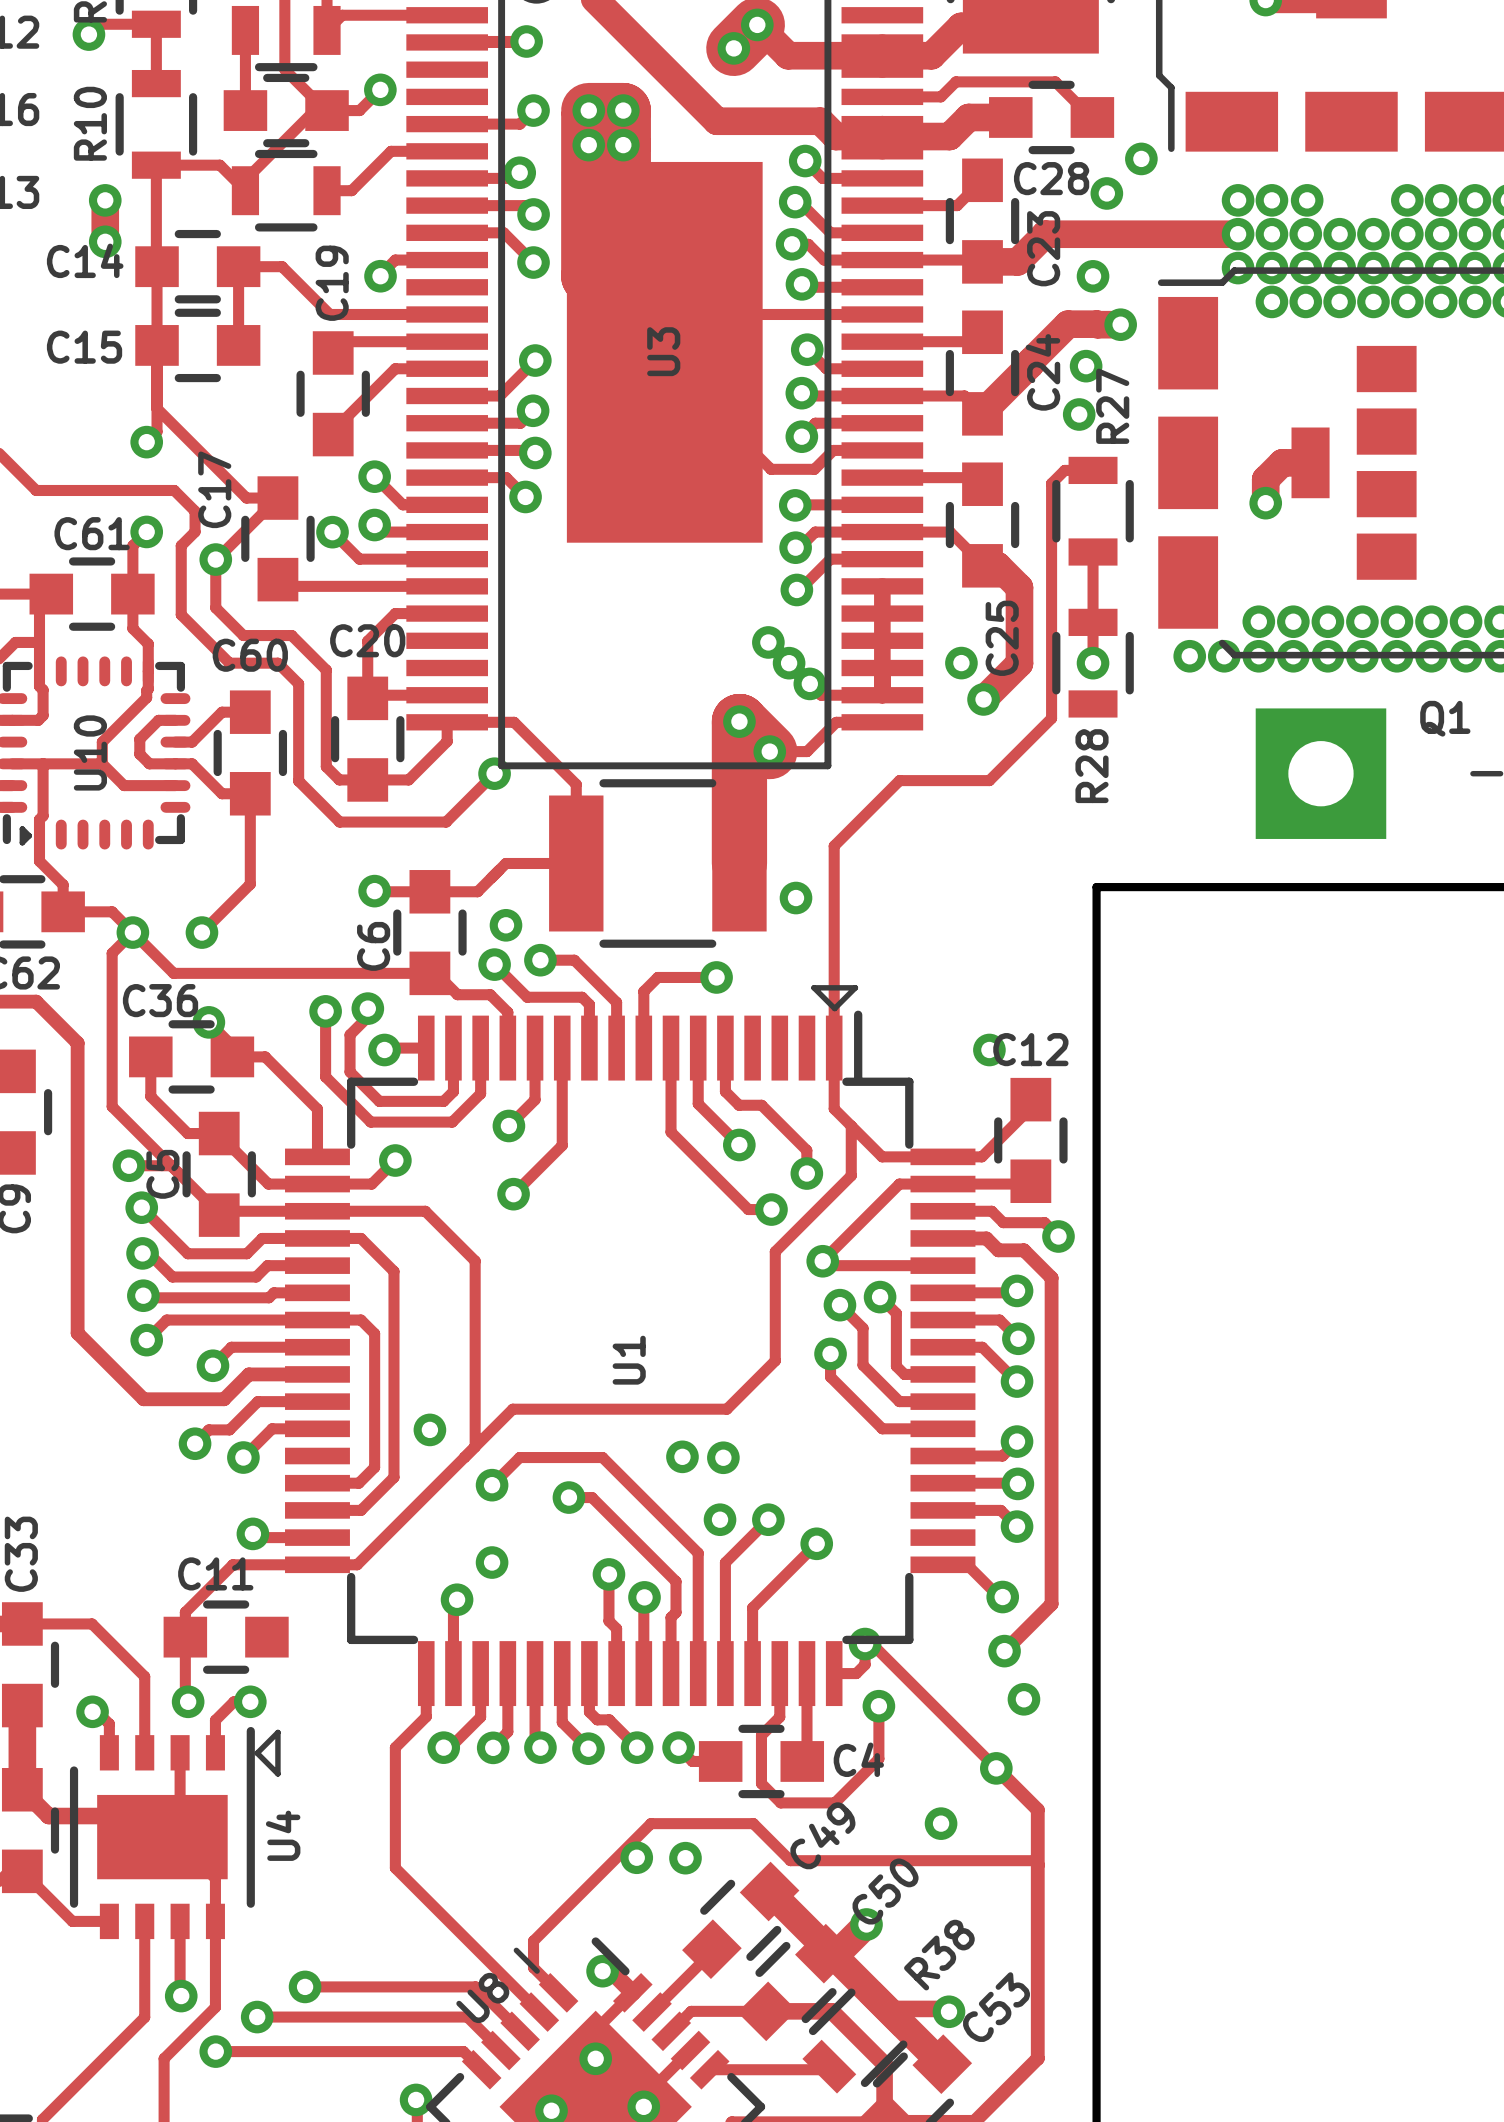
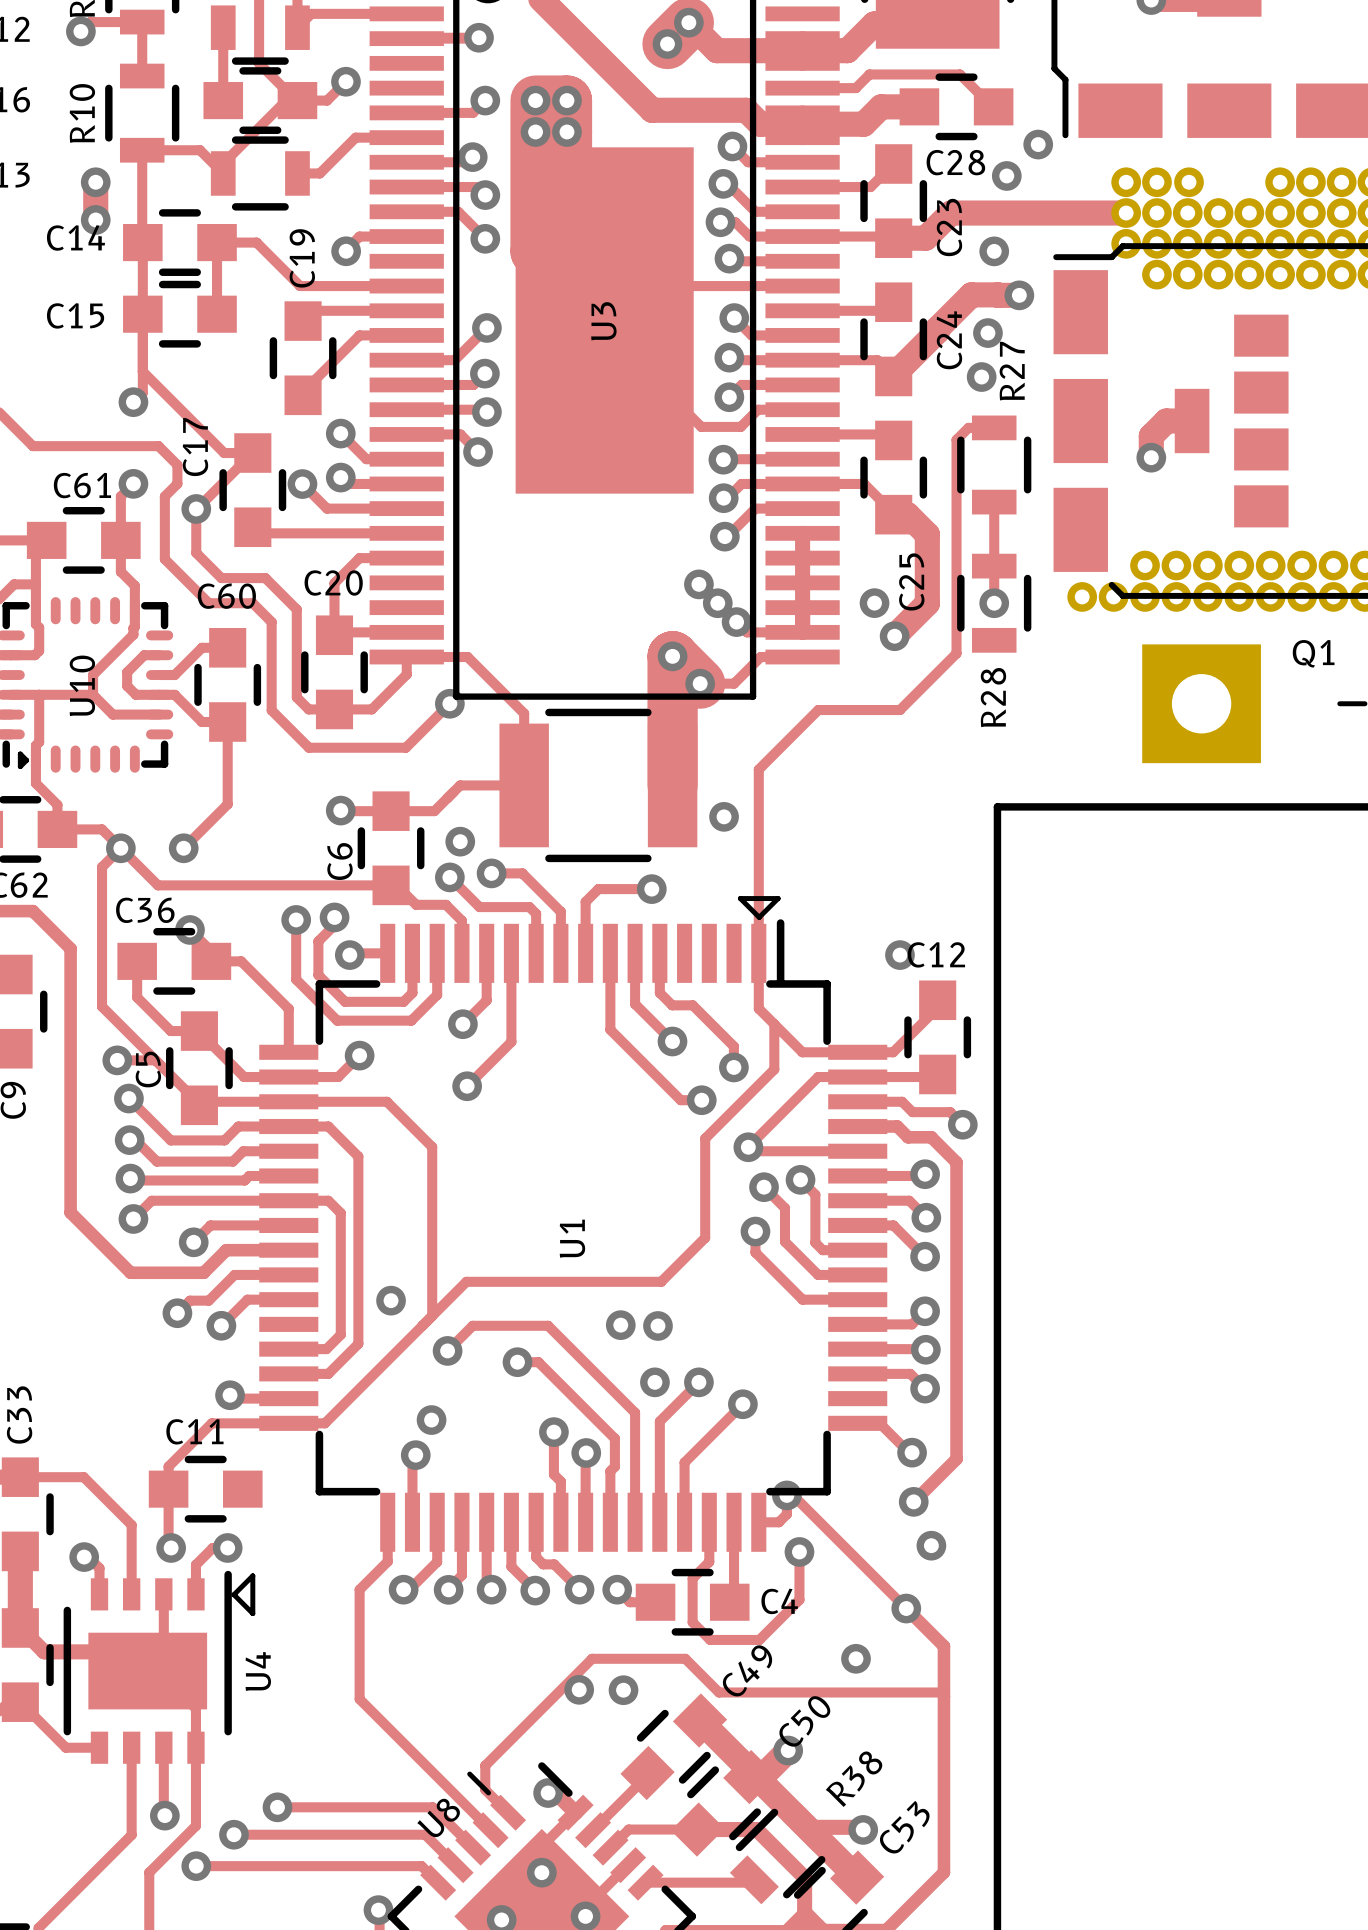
via position: (492, 1562) -> (431, 1420)

